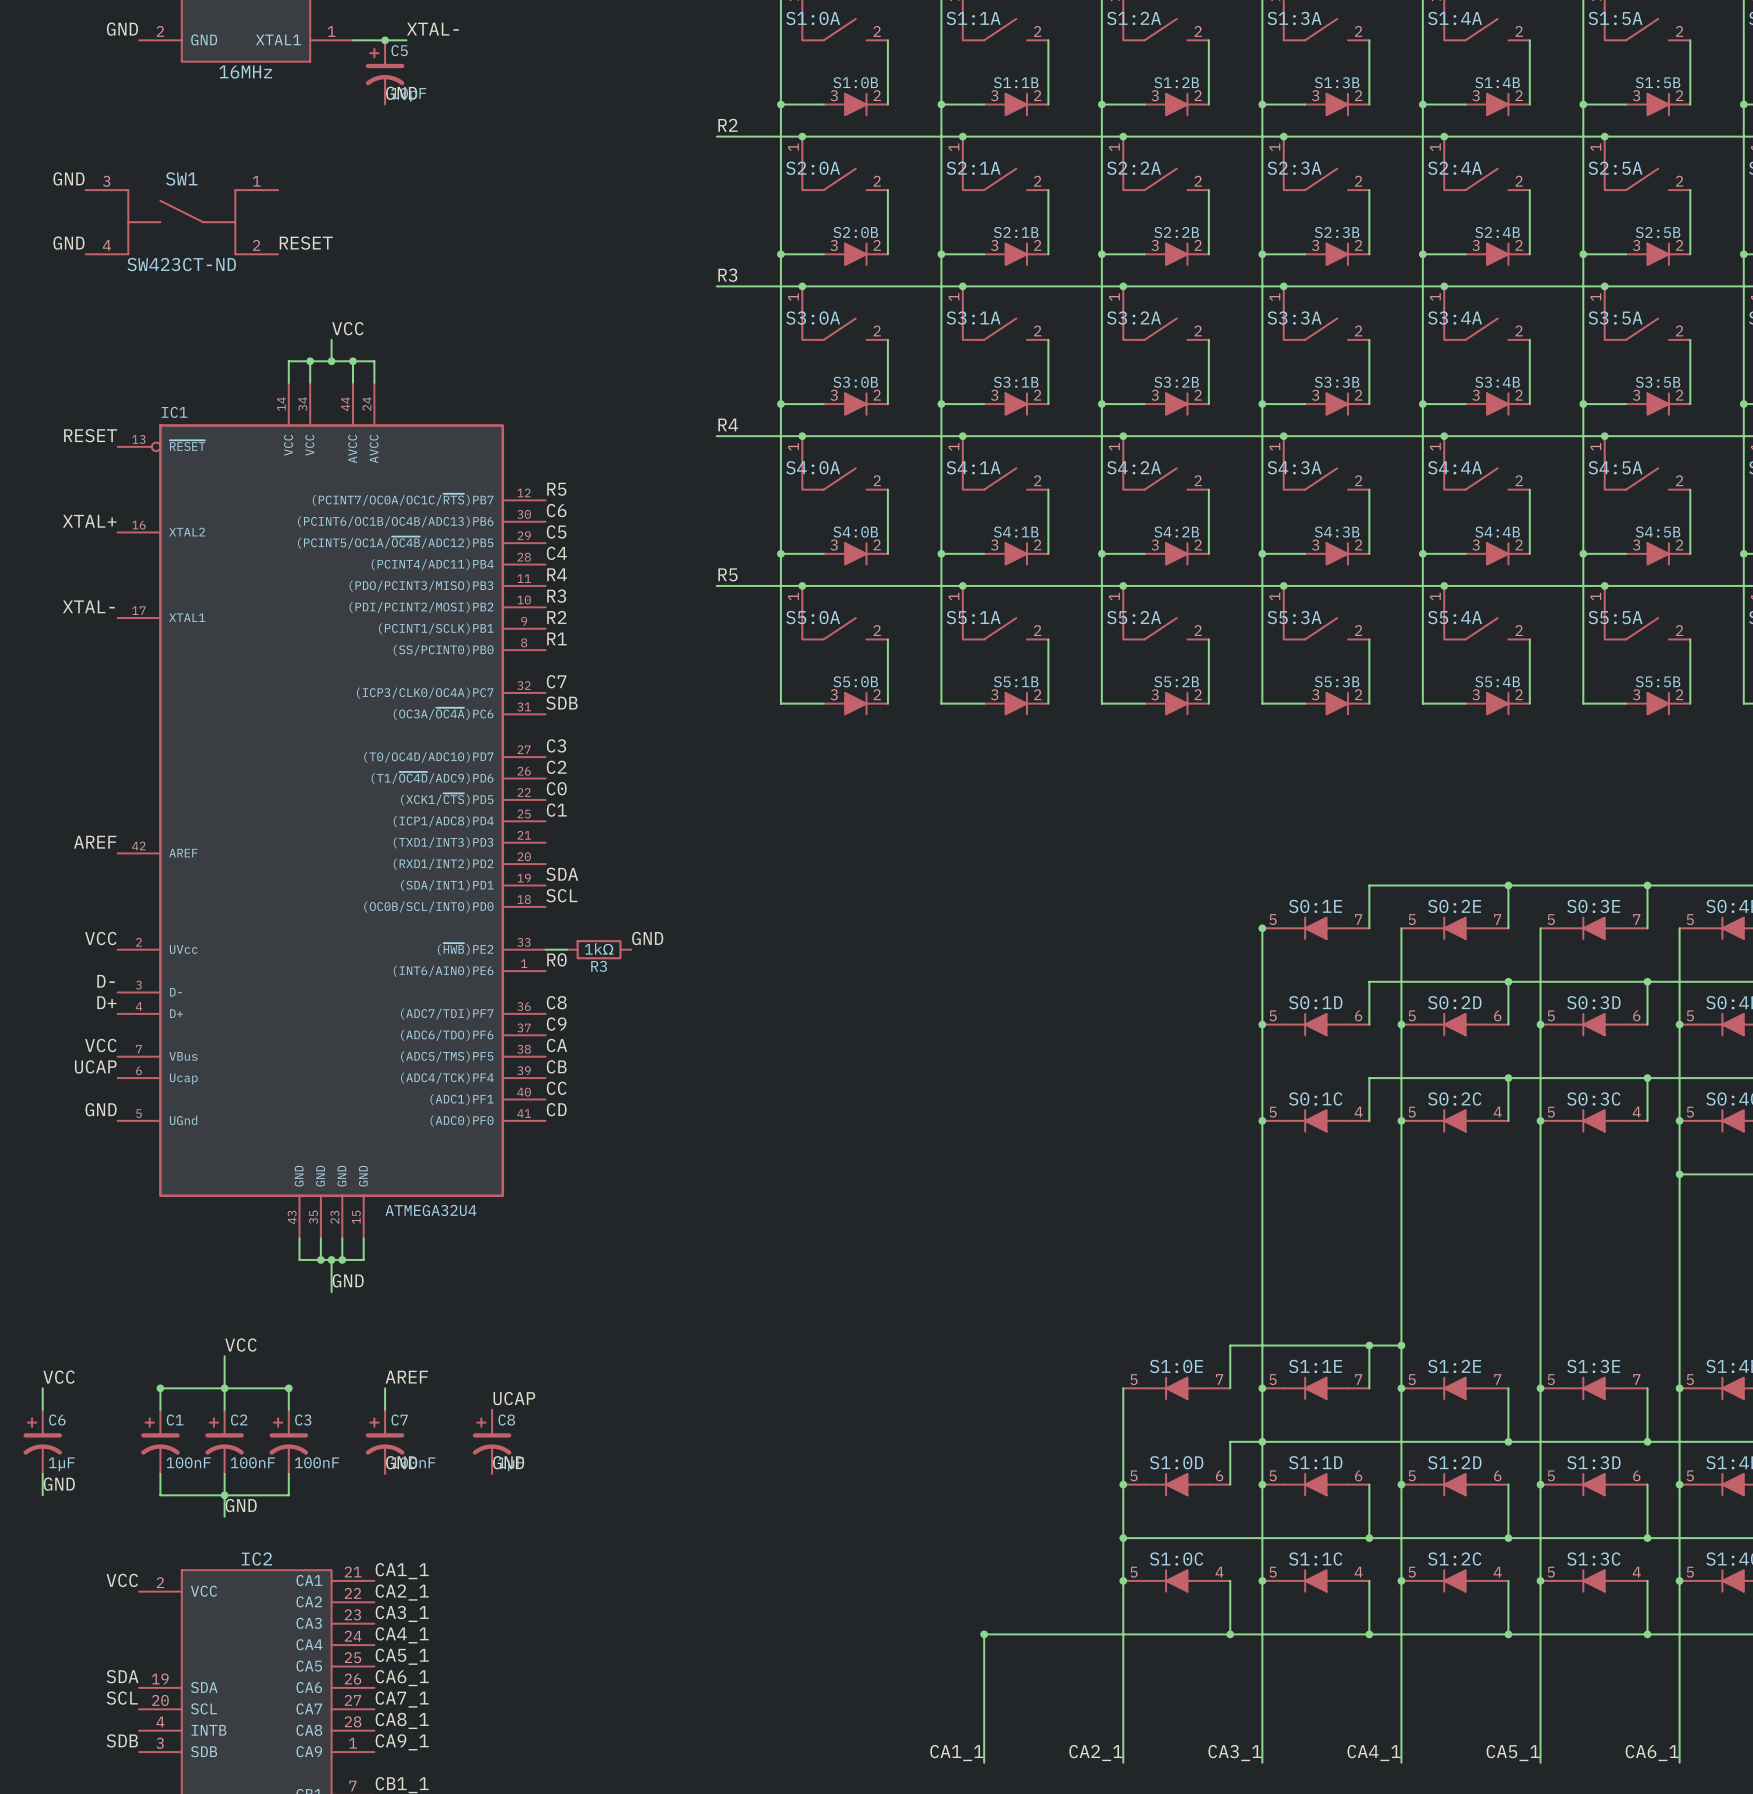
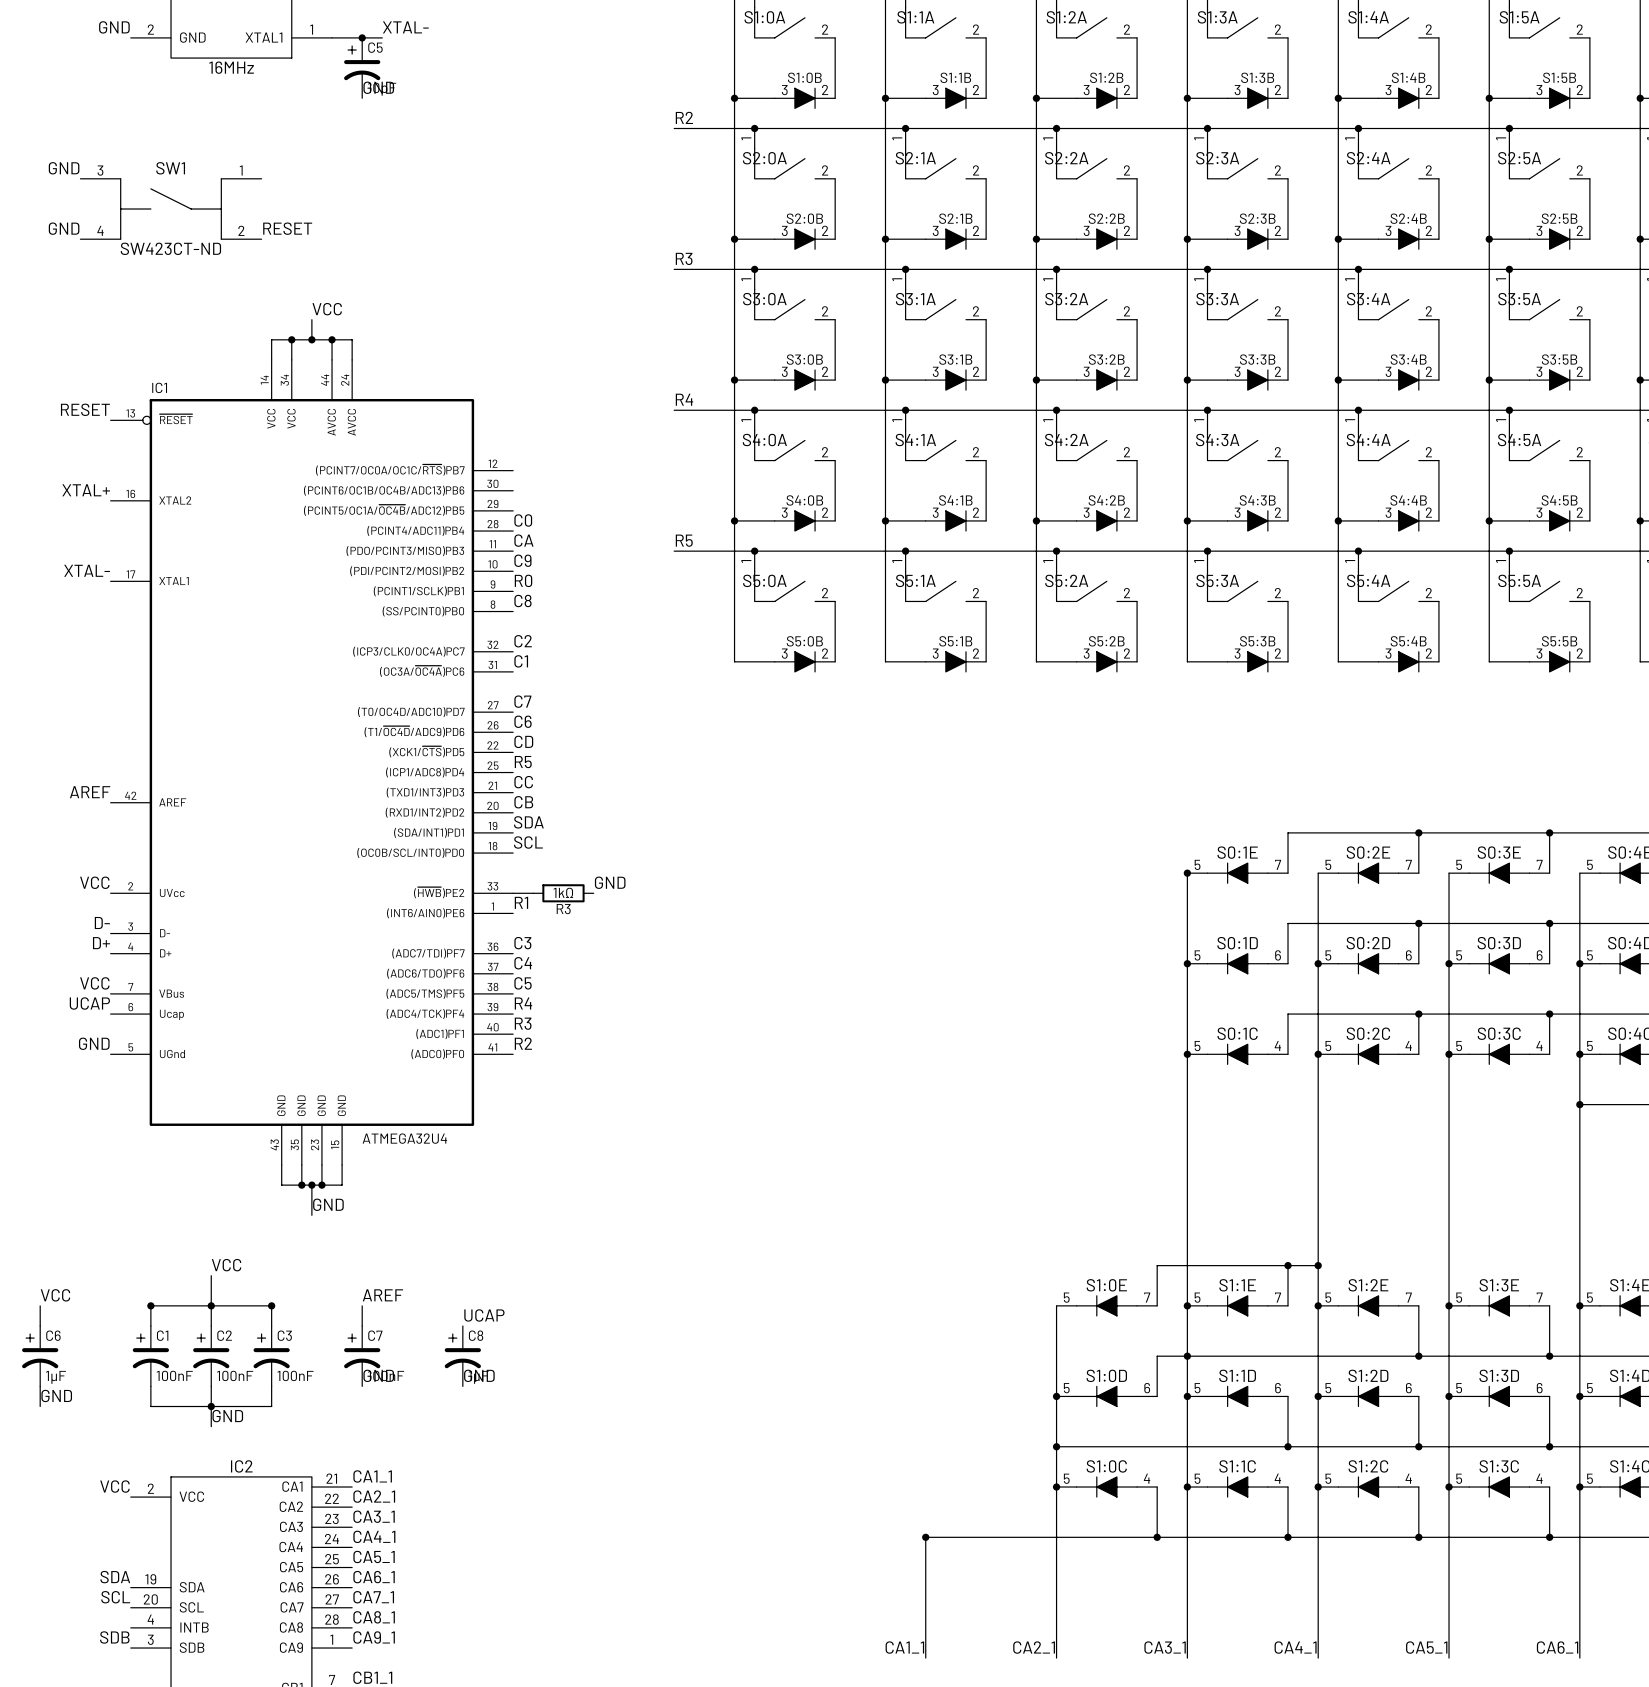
label: R5 (556, 489) -> none
label: C6 (556, 510) -> none
label: C5 (556, 531) -> none
label: C4 (556, 553) -> C0 (523, 520)
label: R4 (557, 574) -> CA (523, 540)
label: R3 (556, 596) -> C9 (522, 560)
label: R2 (556, 617) -> R0 (523, 580)
label: R1 (556, 638) -> C8 (522, 600)
label: C7 (556, 681) -> C2 (523, 641)
label: SDB (562, 703) -> C1 (521, 661)
label: C3 (556, 745) -> C7 (522, 701)
label: C2 (556, 767) -> C6 (523, 721)
label: C0 (556, 788) -> CD (523, 741)
label: C1 (556, 810) -> R5 (523, 762)
label: none -> CC (523, 782)
label: none -> CB (523, 802)
label: R0 (556, 959) -> R1 (521, 902)
label: C8 (556, 1002) -> C3 (522, 943)
label: C9 (556, 1024) -> C4 (523, 963)
label: CA (556, 1045) -> C5 (523, 983)
label: CB (556, 1066) -> R4 (523, 1003)
label: CC (556, 1088) -> R3 (523, 1023)
label: CD (556, 1109) -> R2 (523, 1043)

